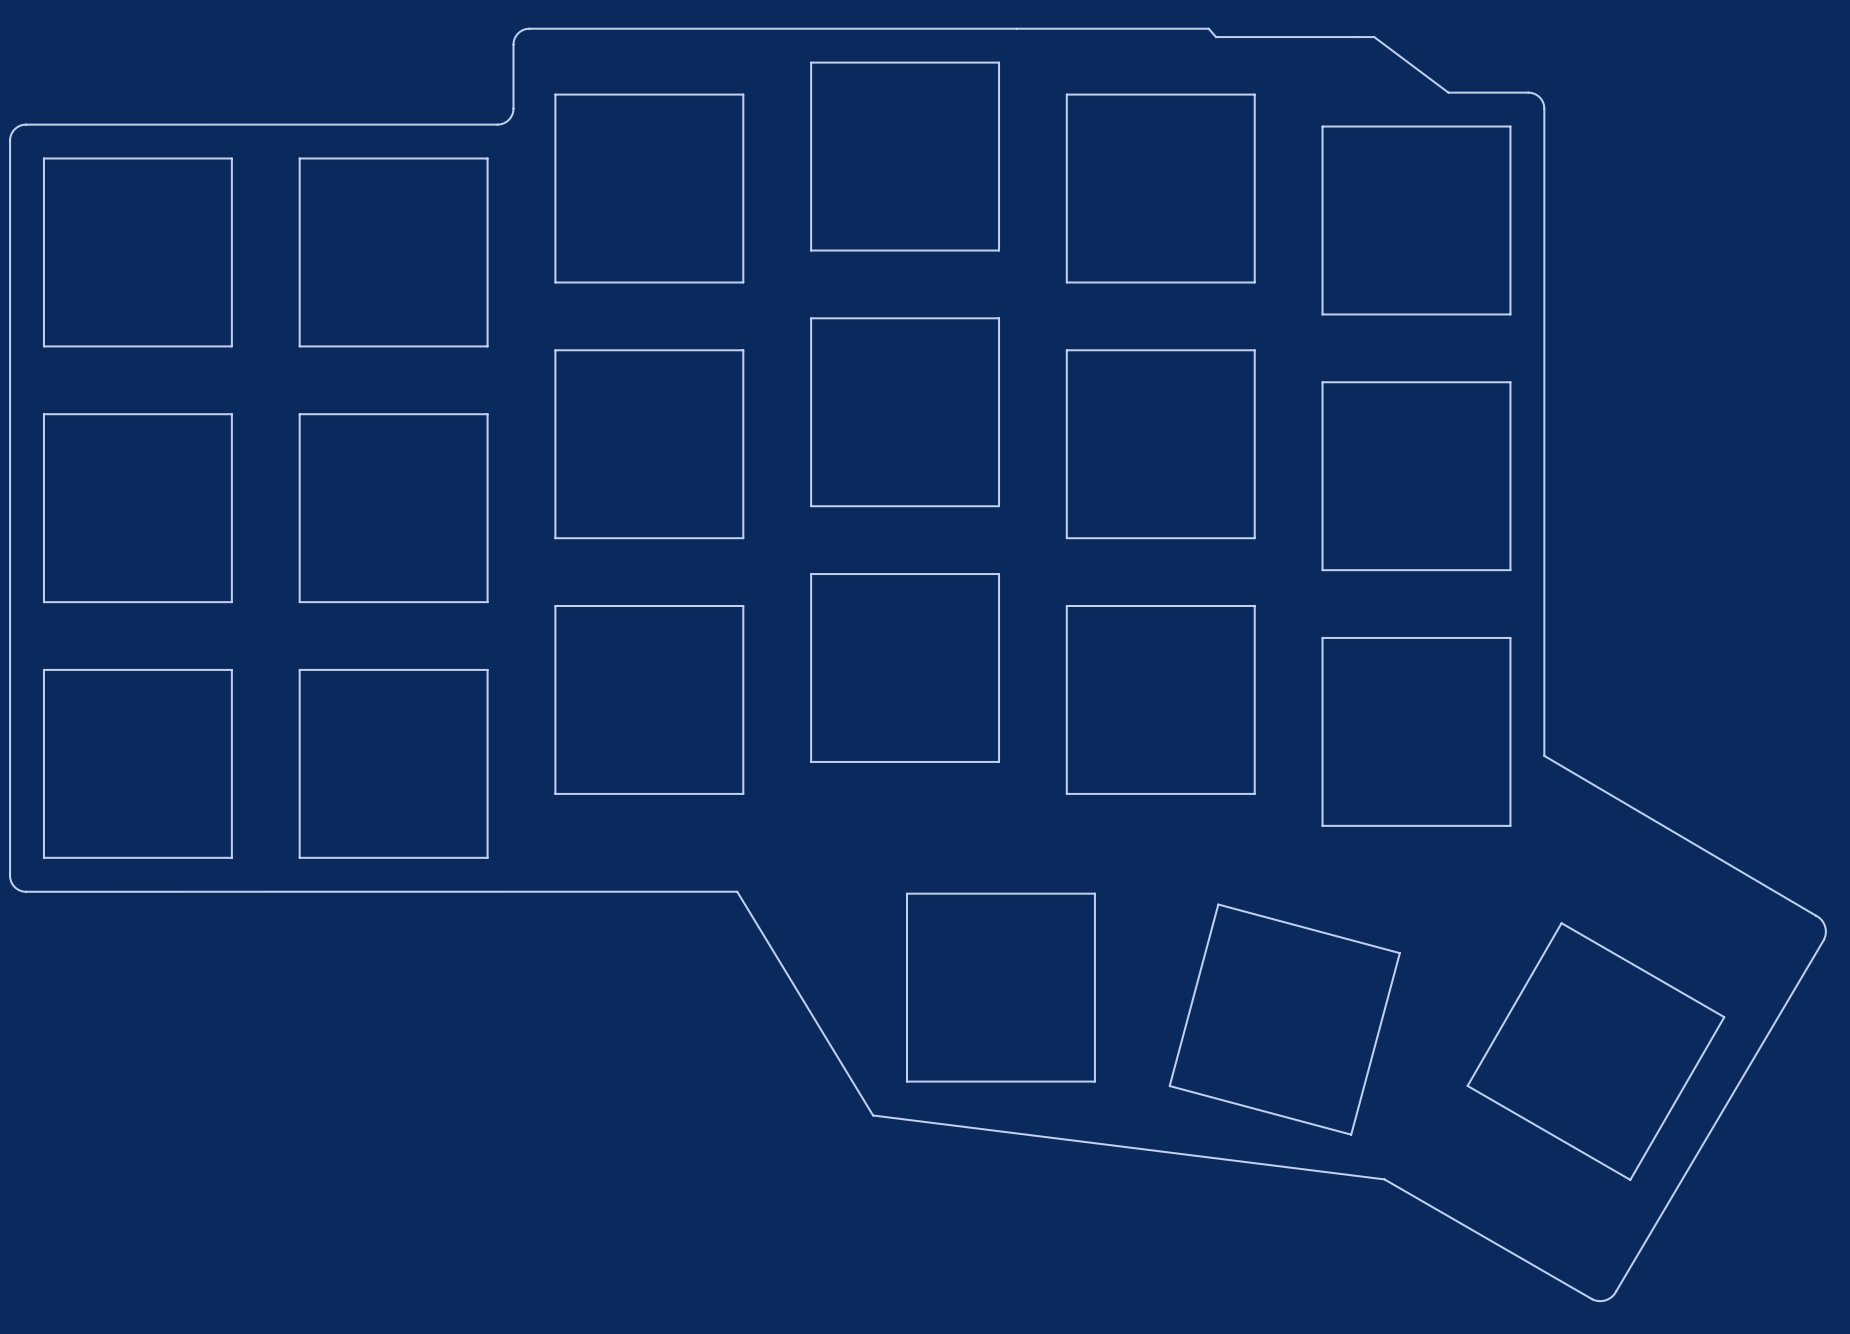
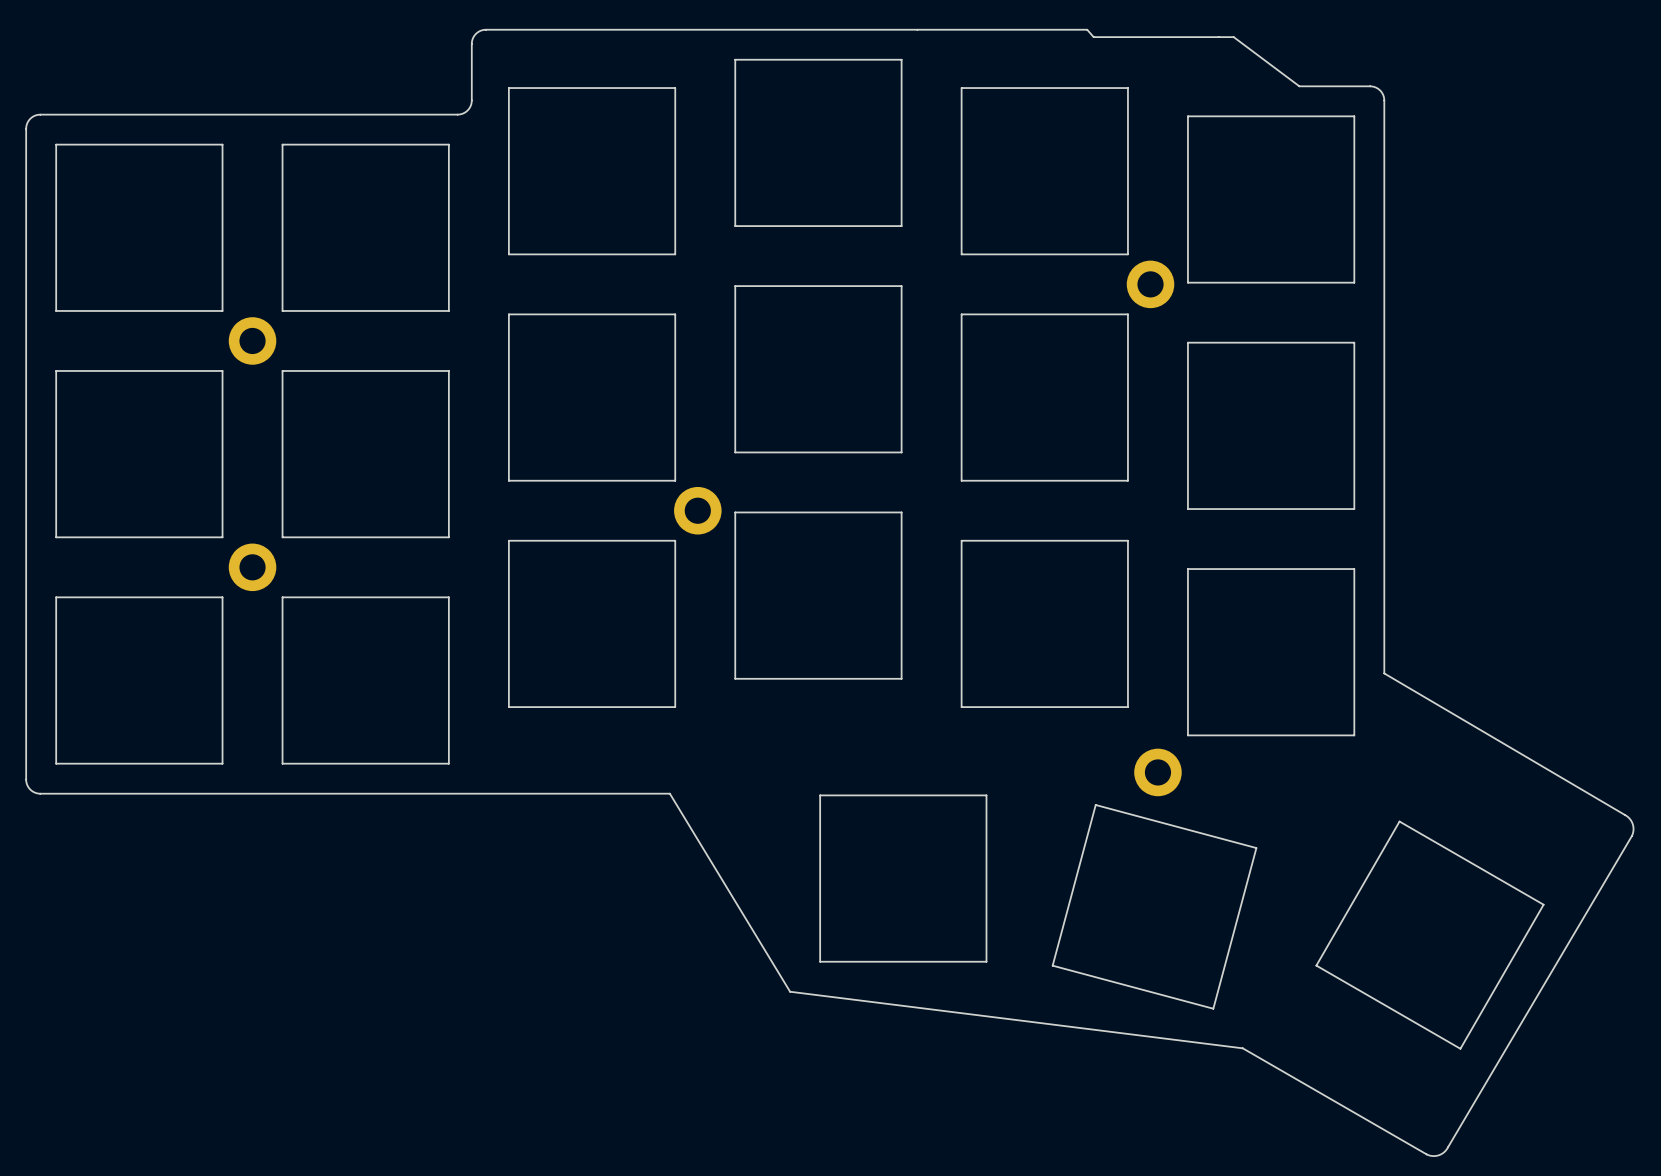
part: none -> (1150, 284)
part: none -> (252, 340)
part: none -> (697, 510)
part: none -> (252, 567)
part: none -> (1157, 772)

